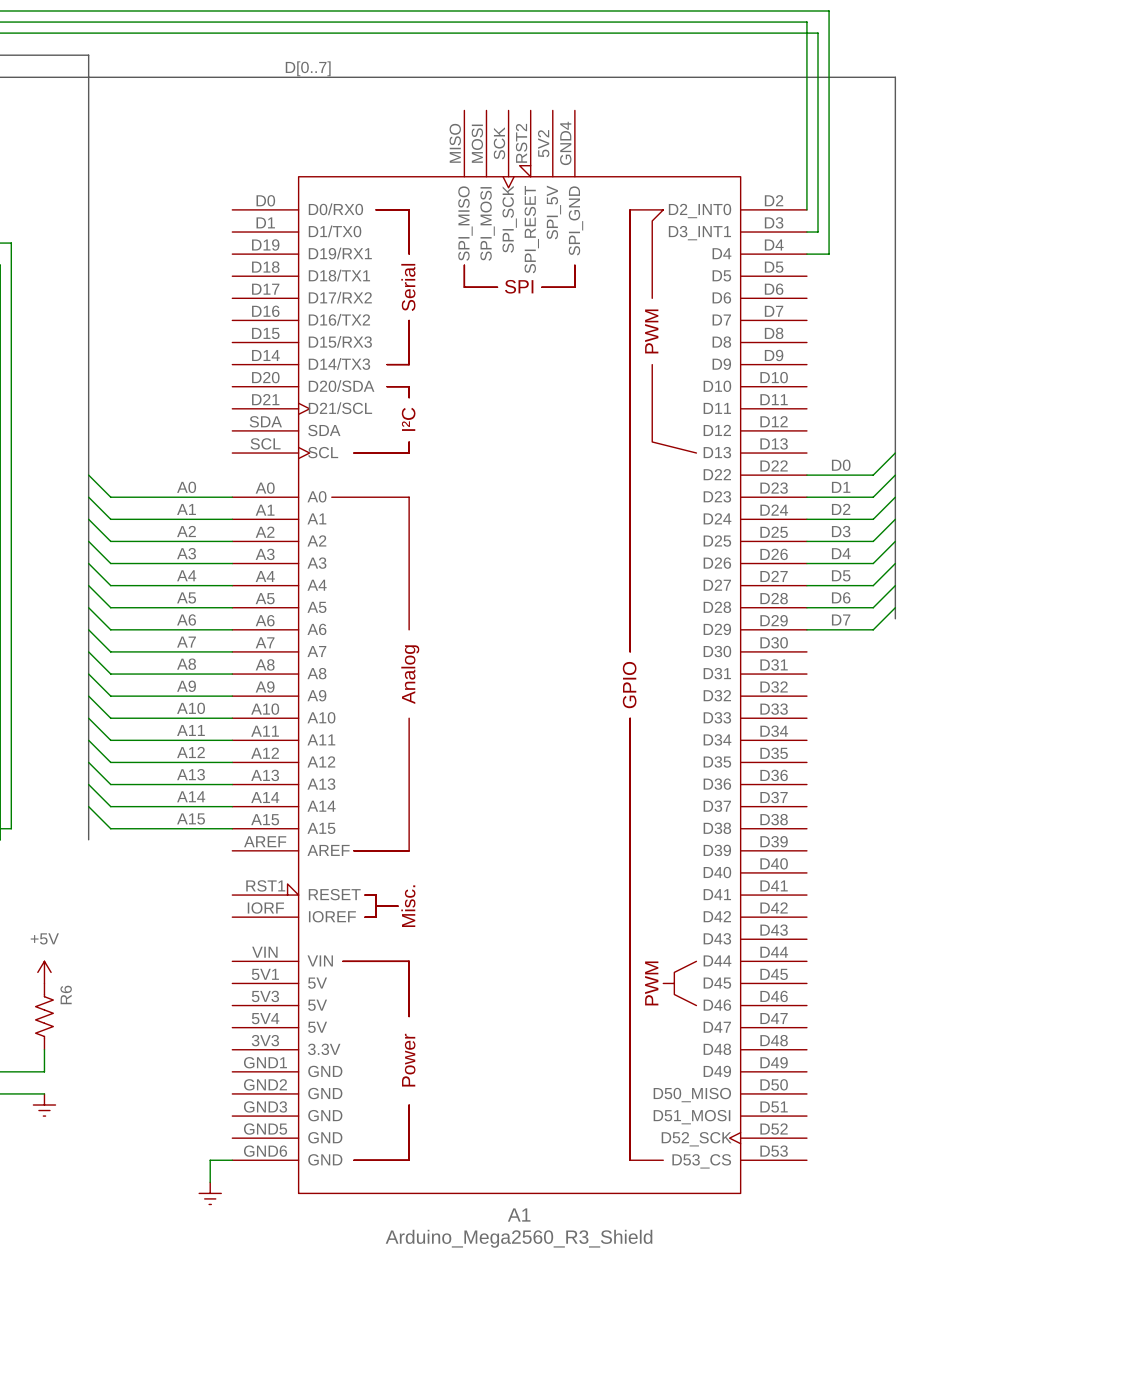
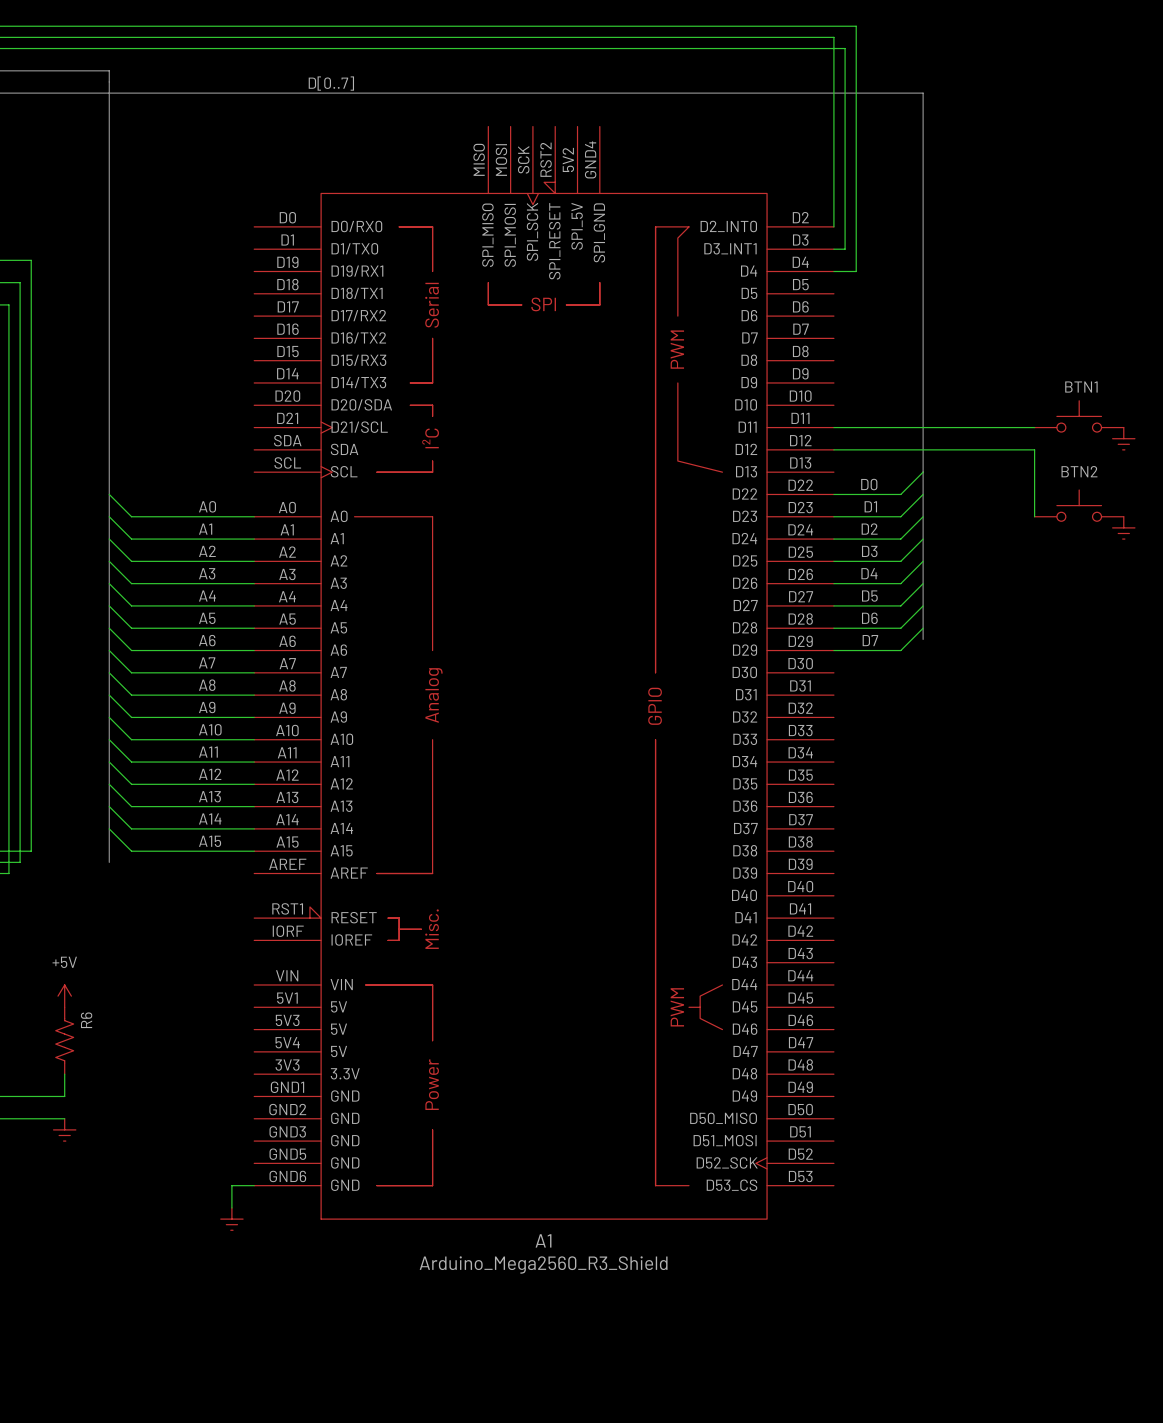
BTN1: none -> (1079, 416)
wire: none -> (833, 427) (1034, 427)
power symbol: none -> (1123, 438)
wire: none -> (833, 449) (1034, 449) (1034, 516)
BTN2: none -> (1079, 505)
power symbol: none -> (1123, 527)

